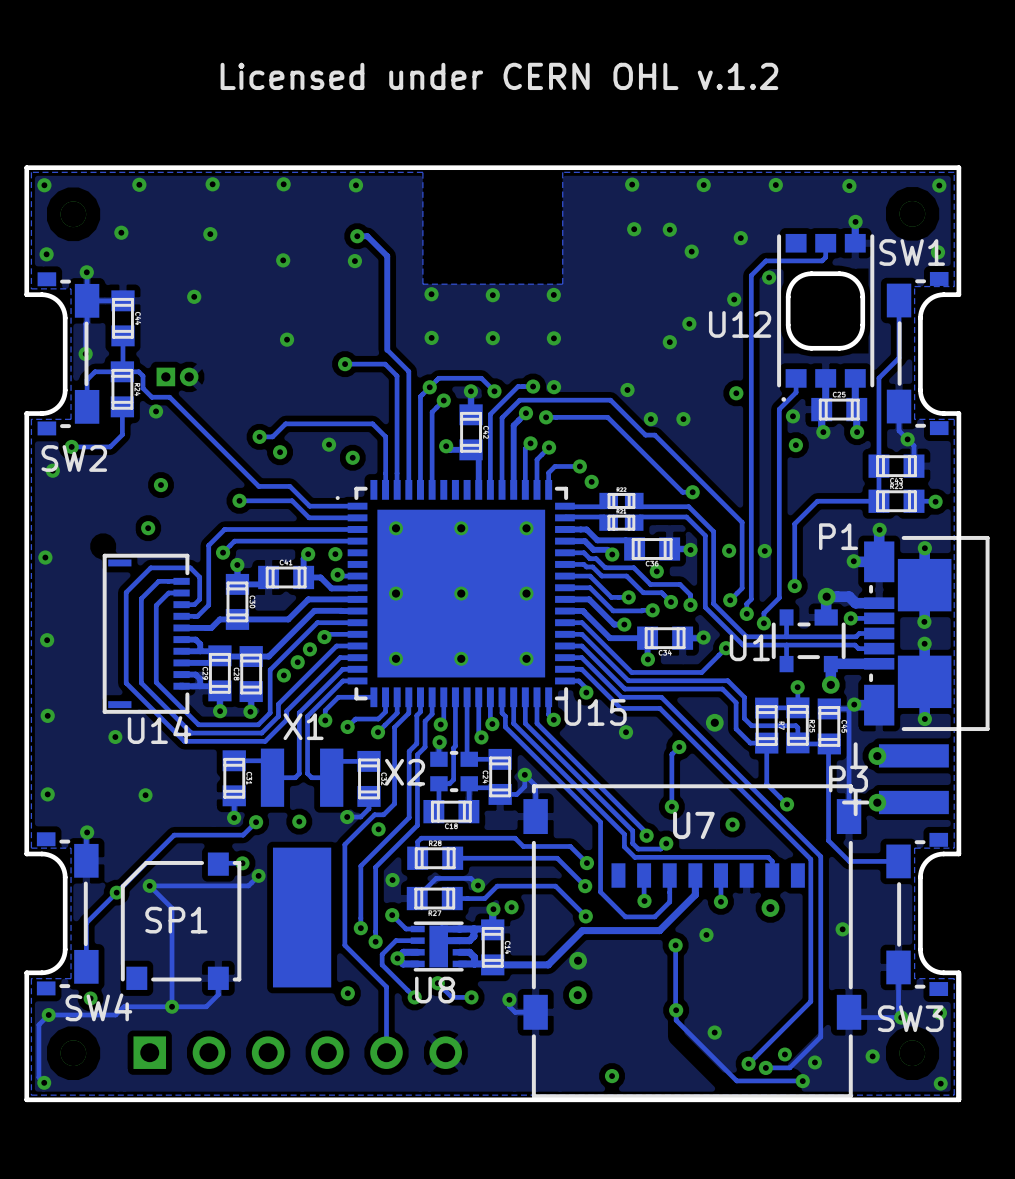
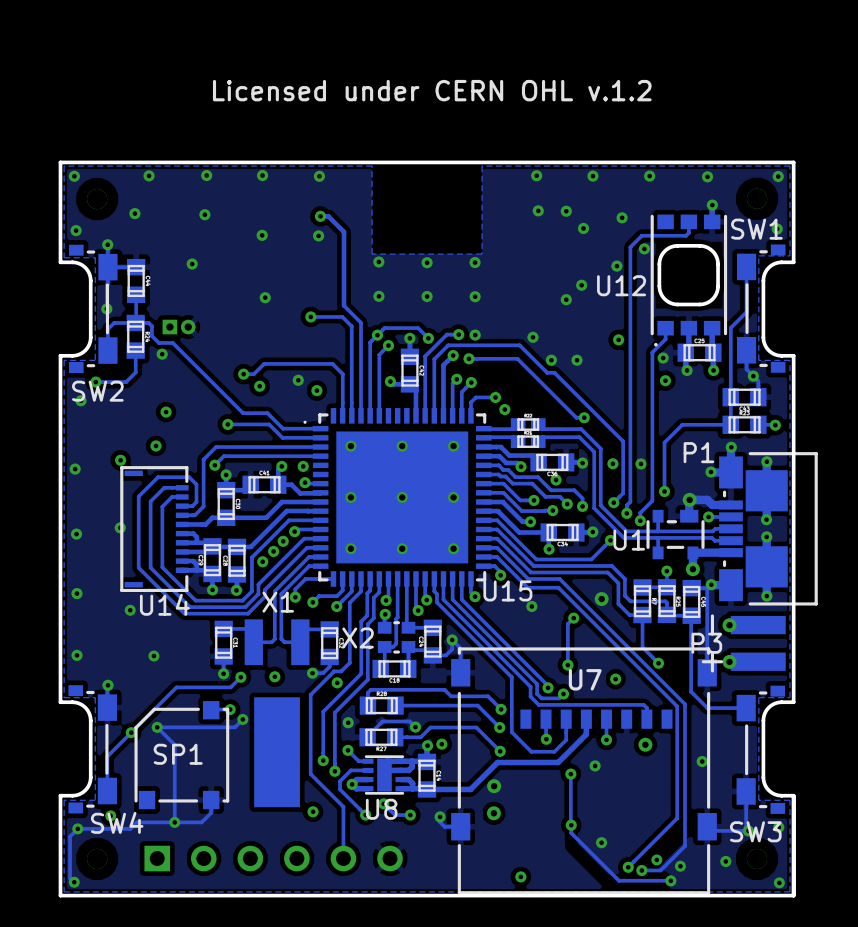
via: none -> (120, 460)
via: none -> (120, 527)

